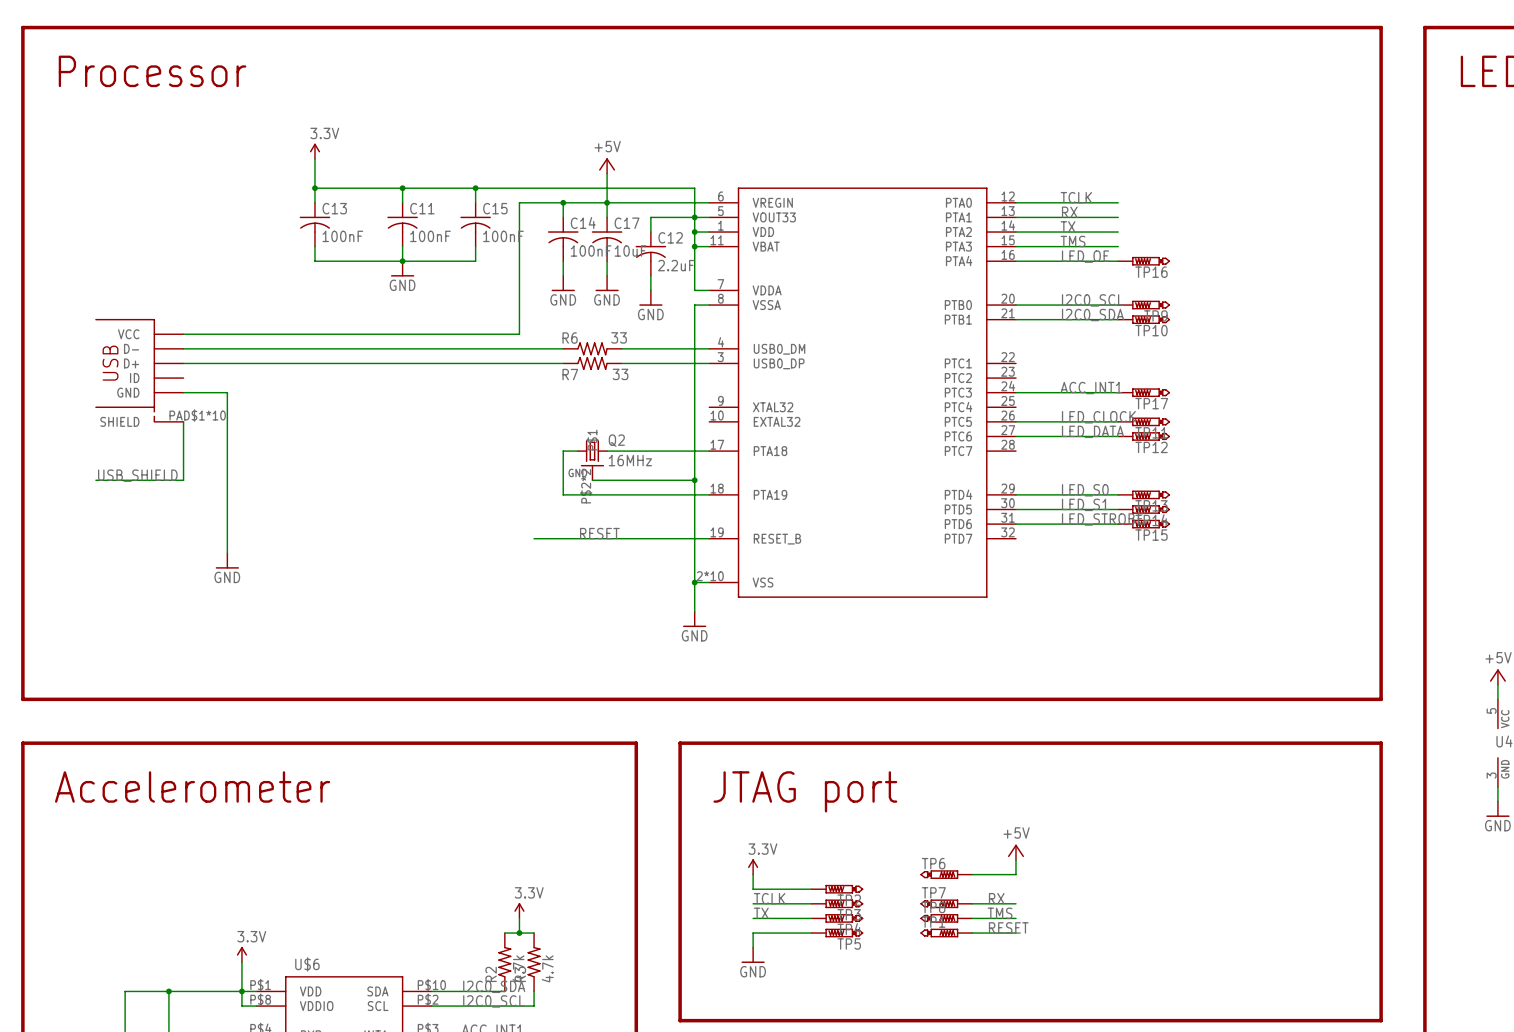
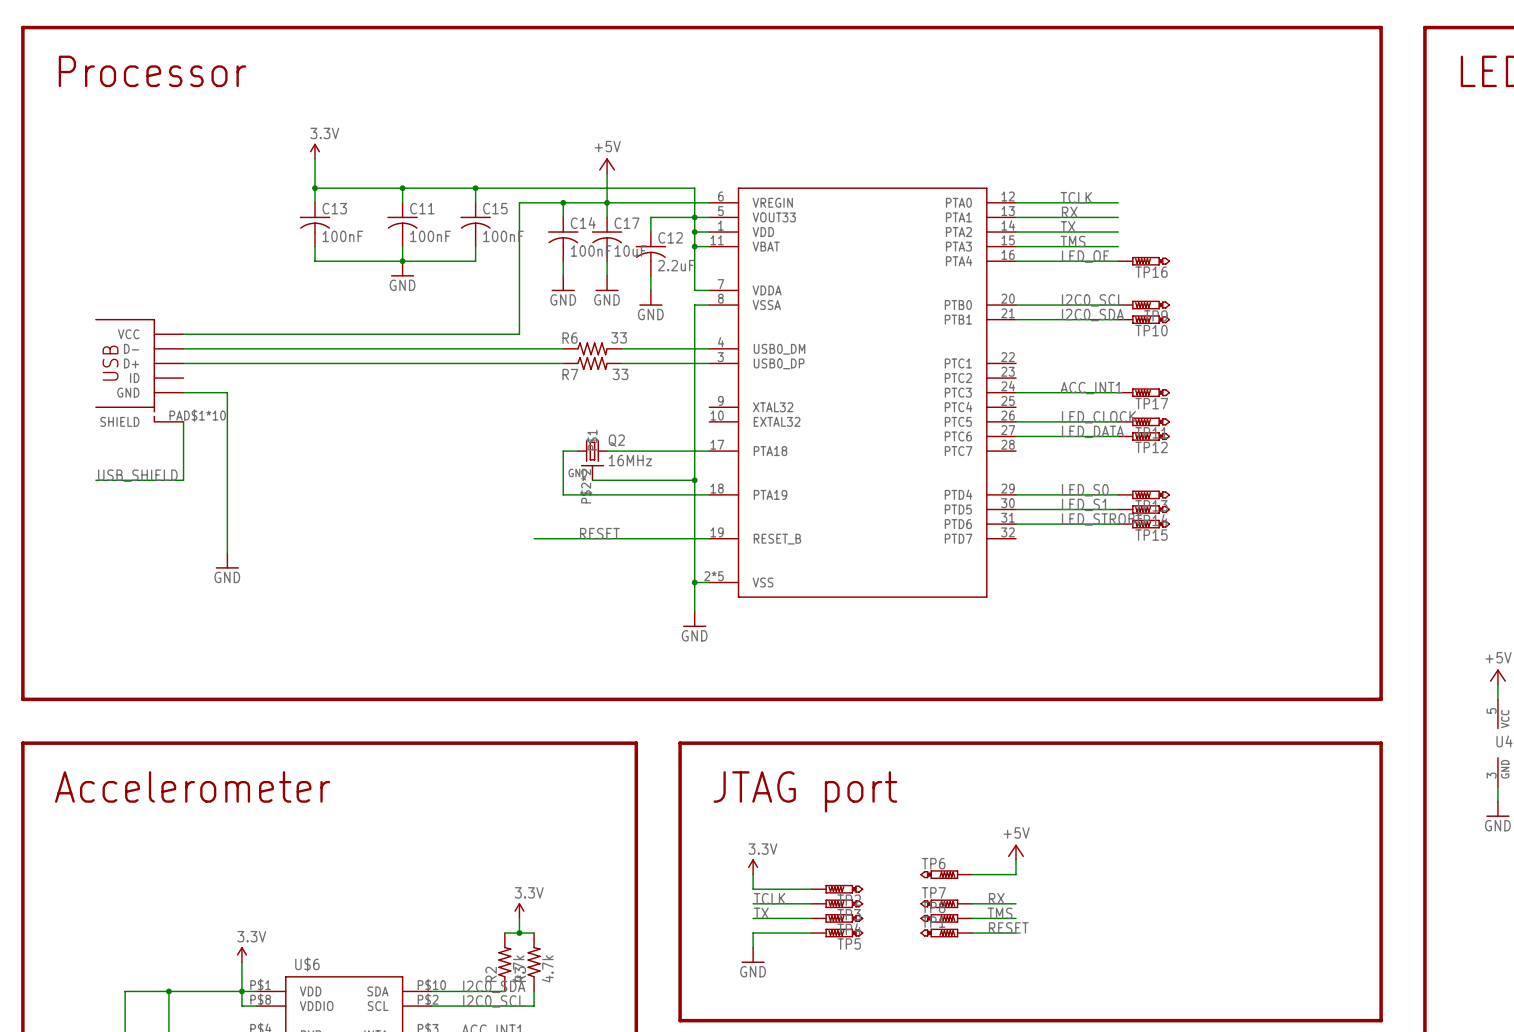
part pin number: 2*10 (710, 576) -> 2*5 (713, 576)

